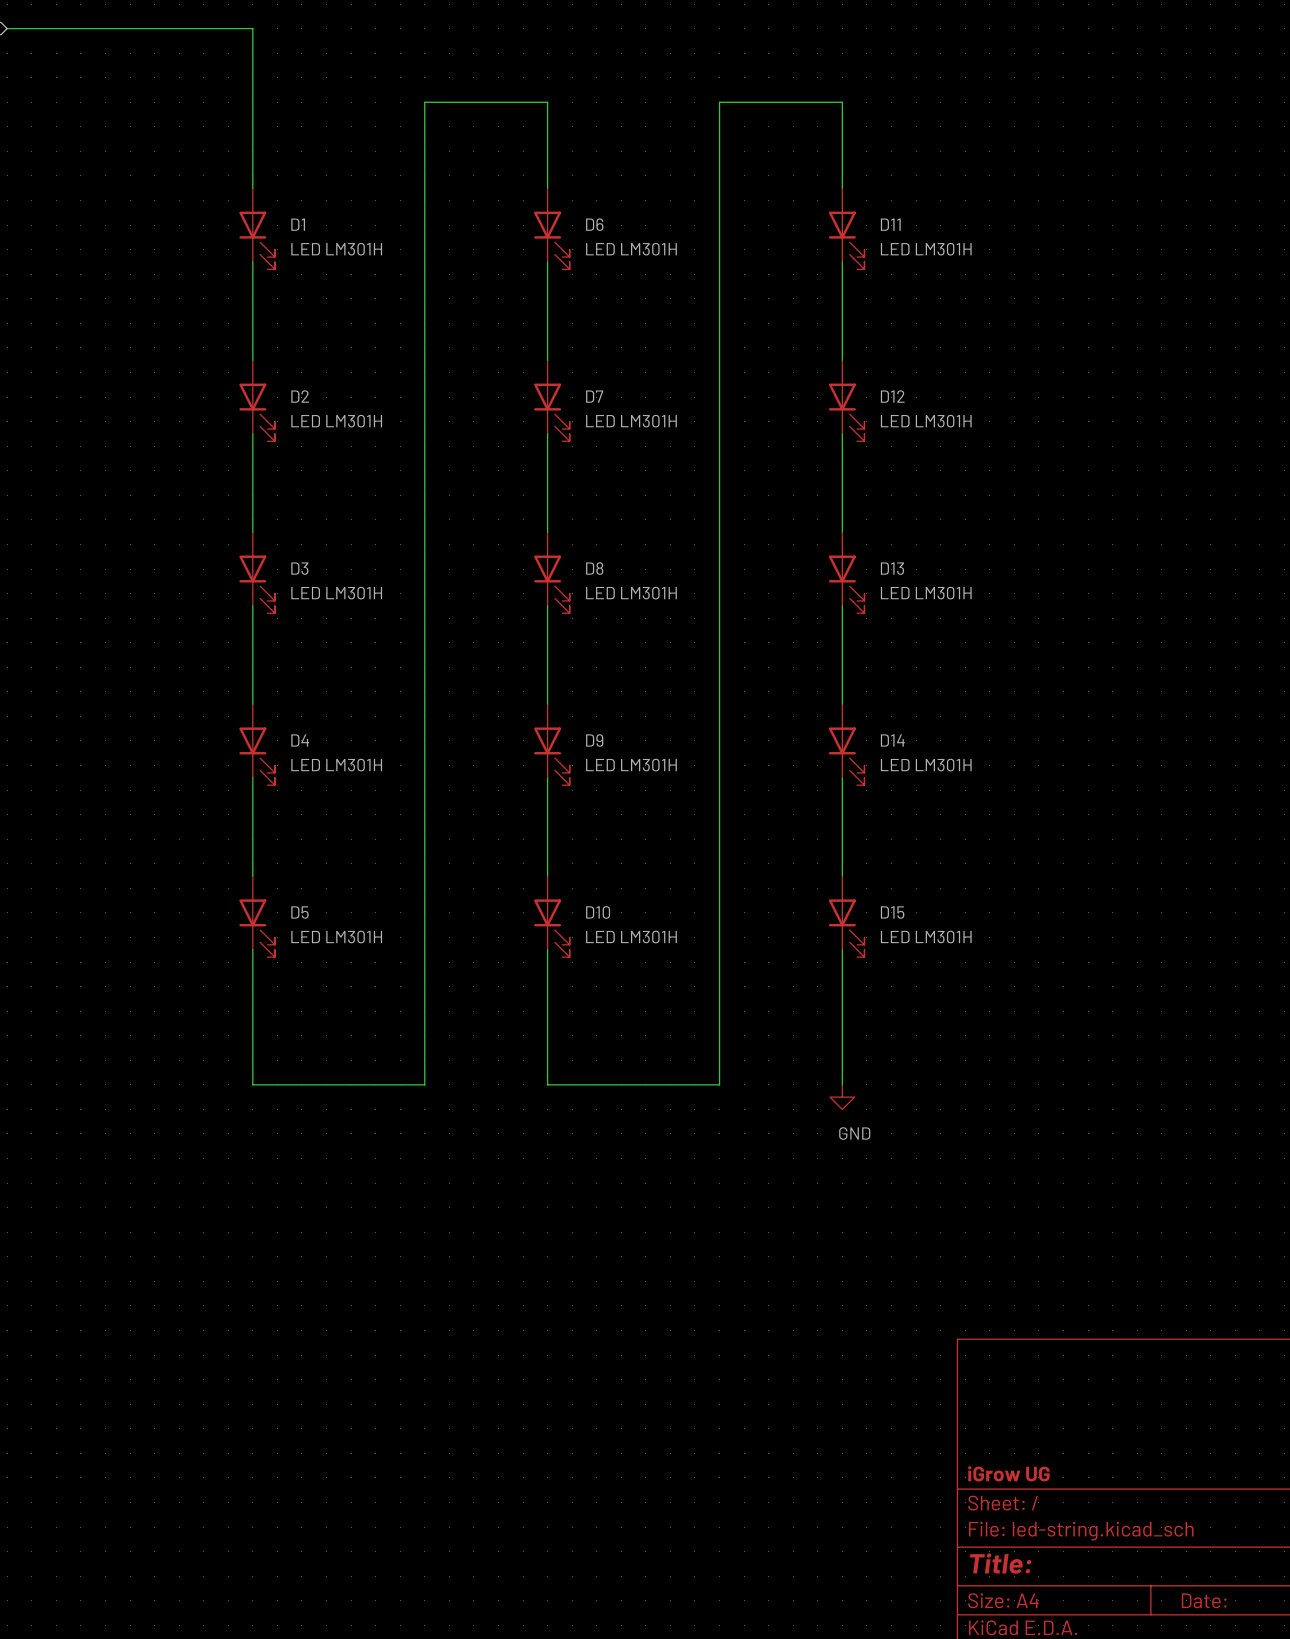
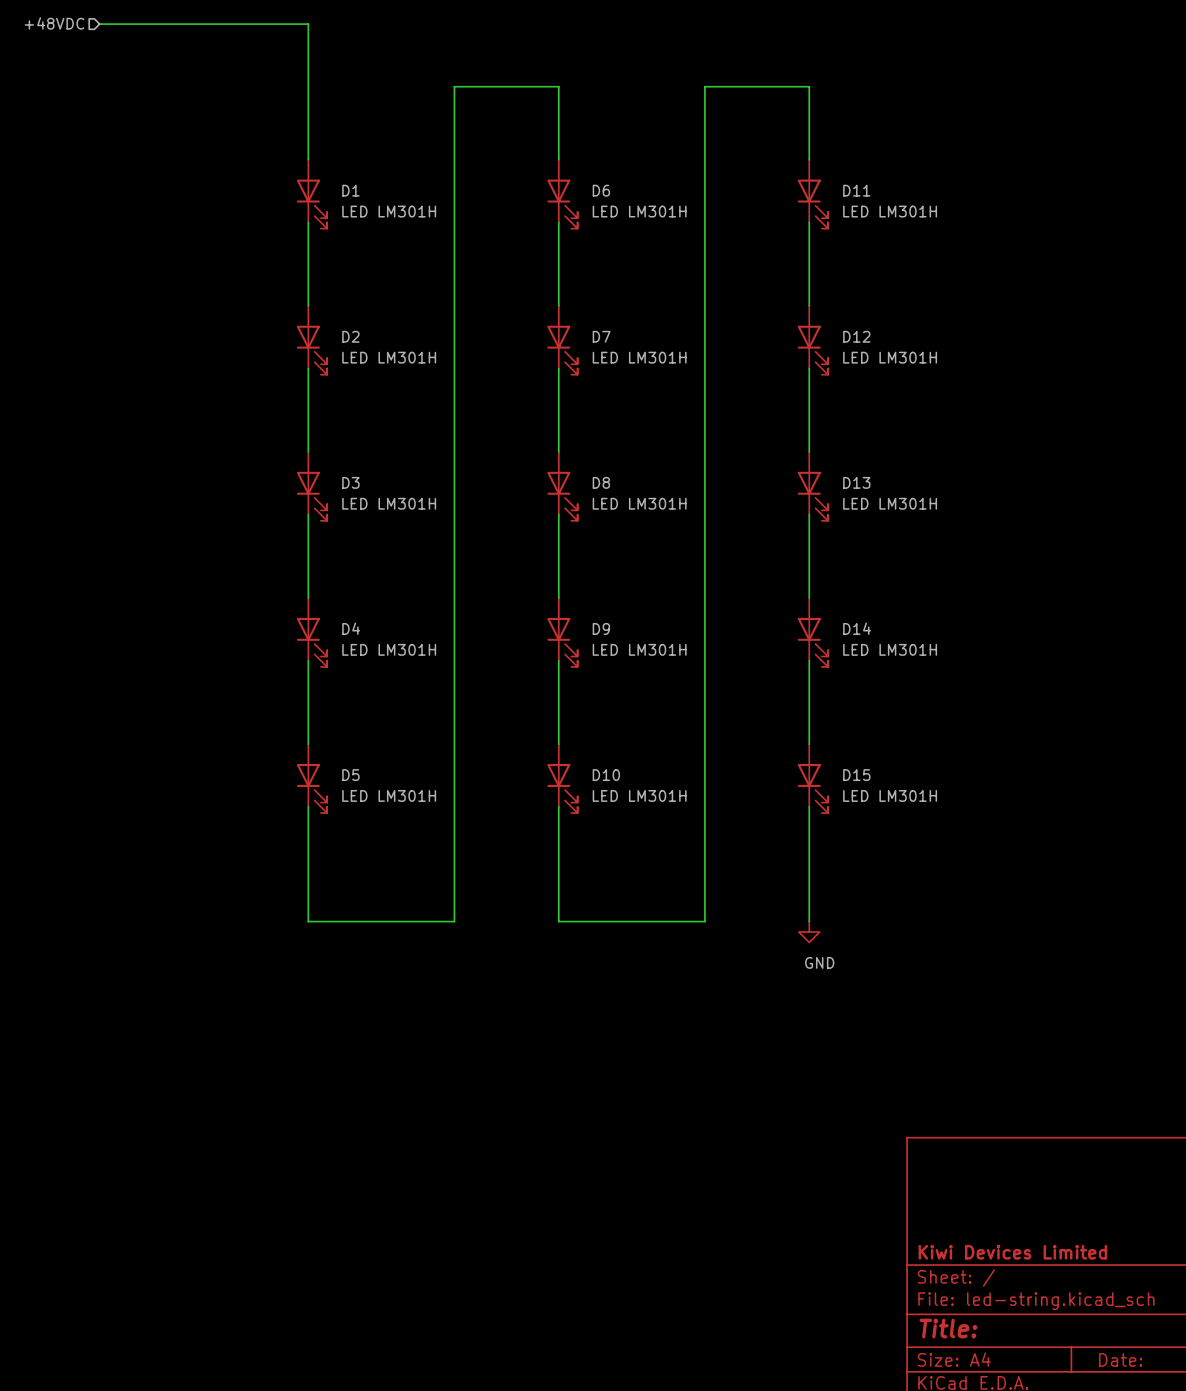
title block: iGrow UG (1008, 1473) -> Kiwi Devices Limited (1012, 1252)

